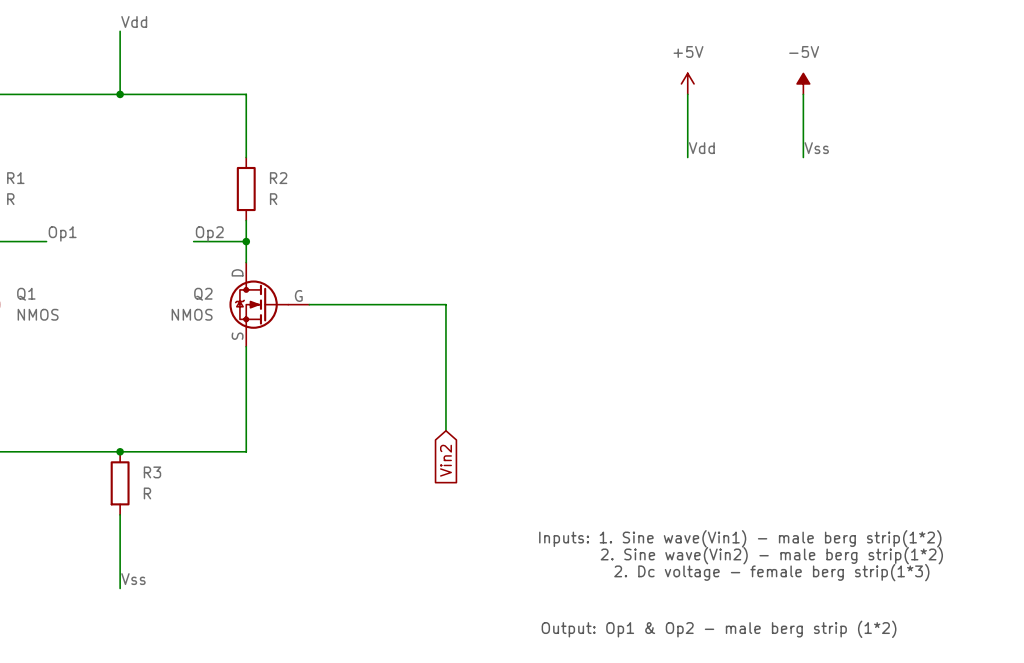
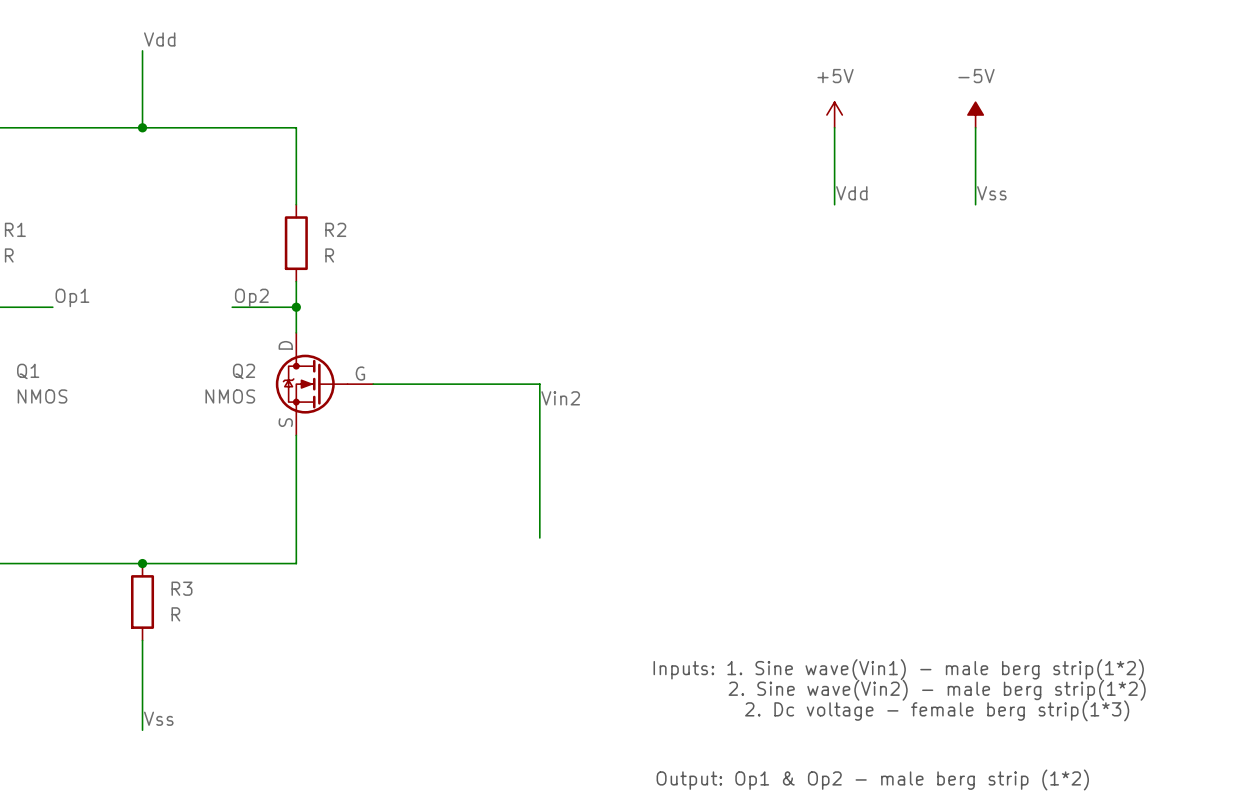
label: none -> Vin2 (560, 398)
global label: Vin2 (445, 460) -> none

